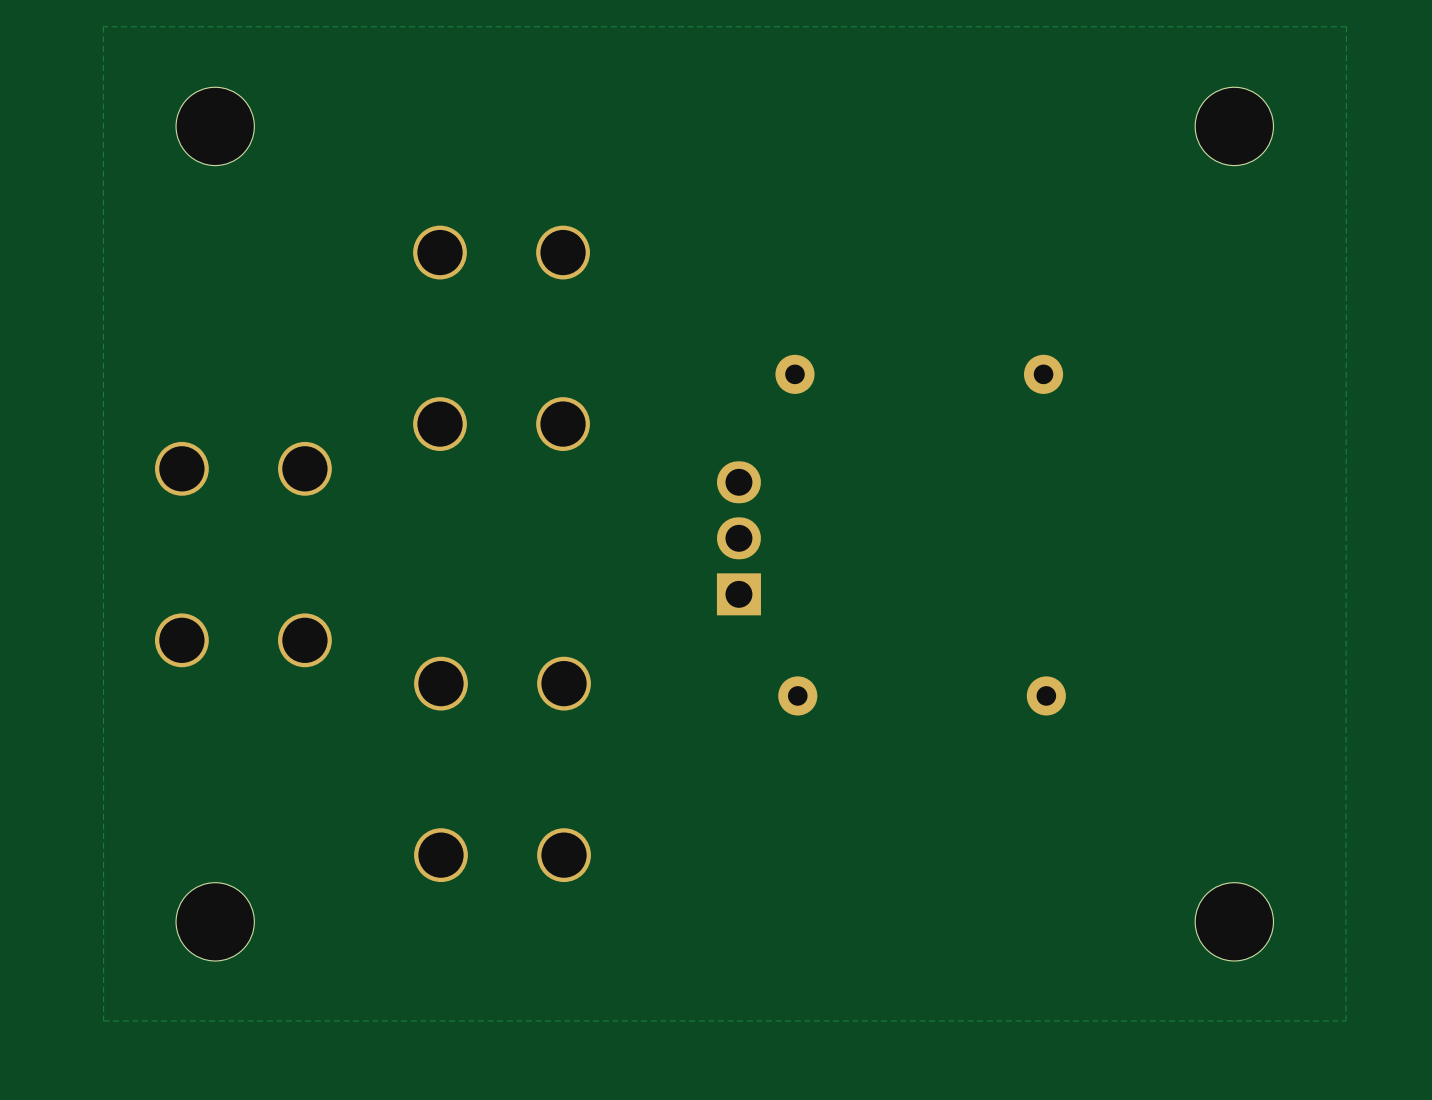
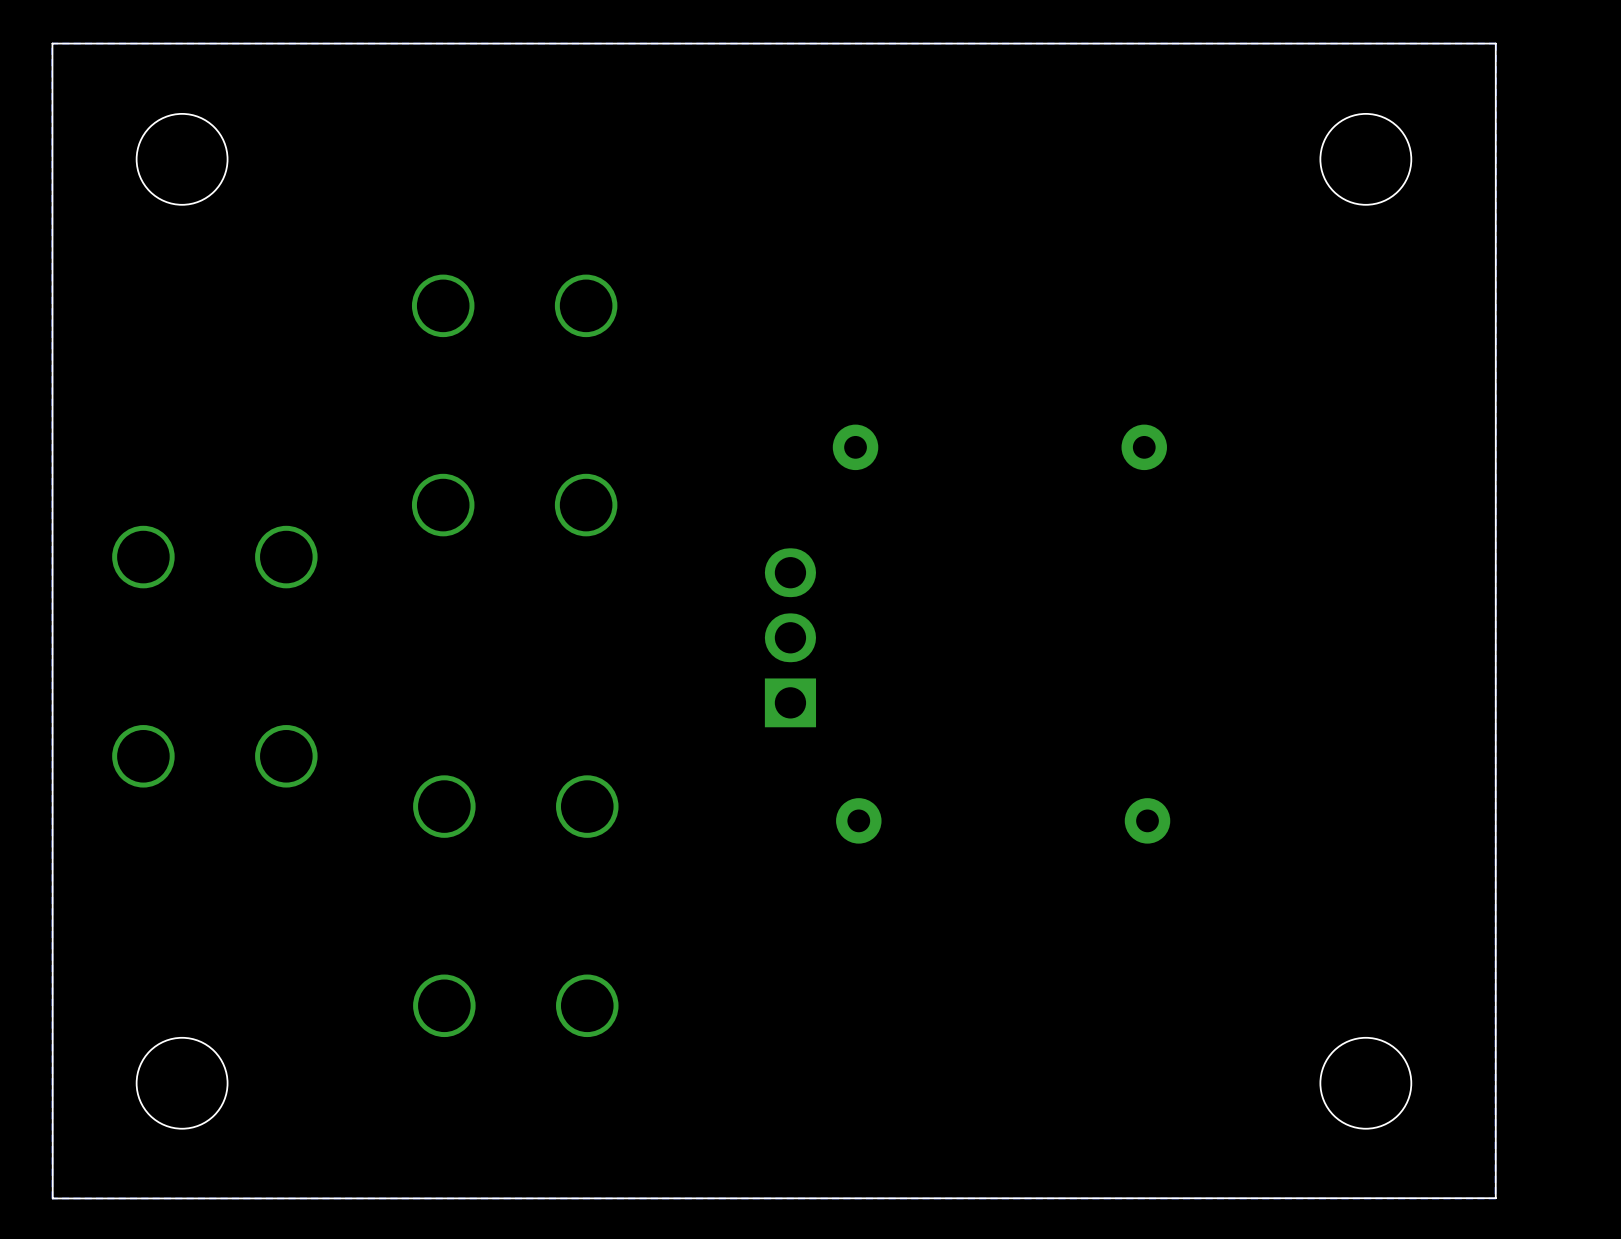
board edge: none -> (1495, 43) (1495, 1198) (52, 1198) (52, 43) (1495, 43)

